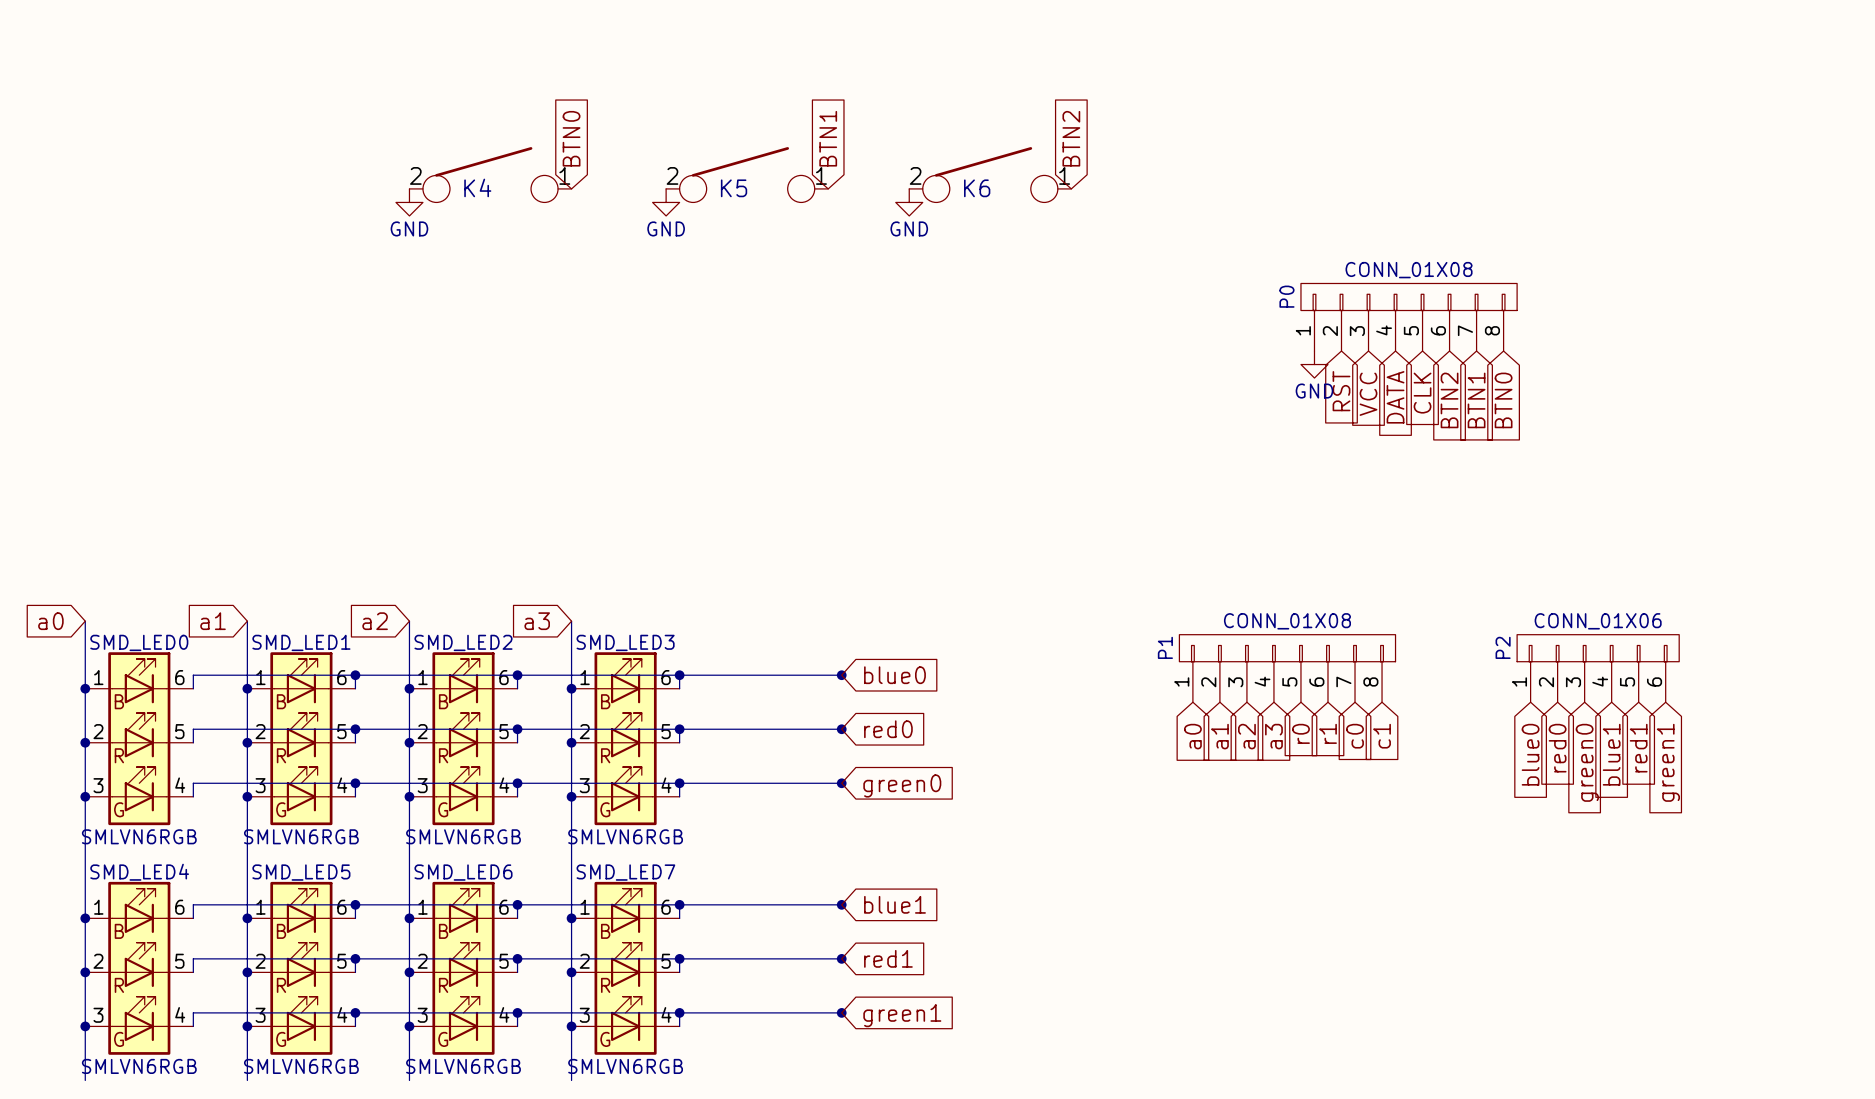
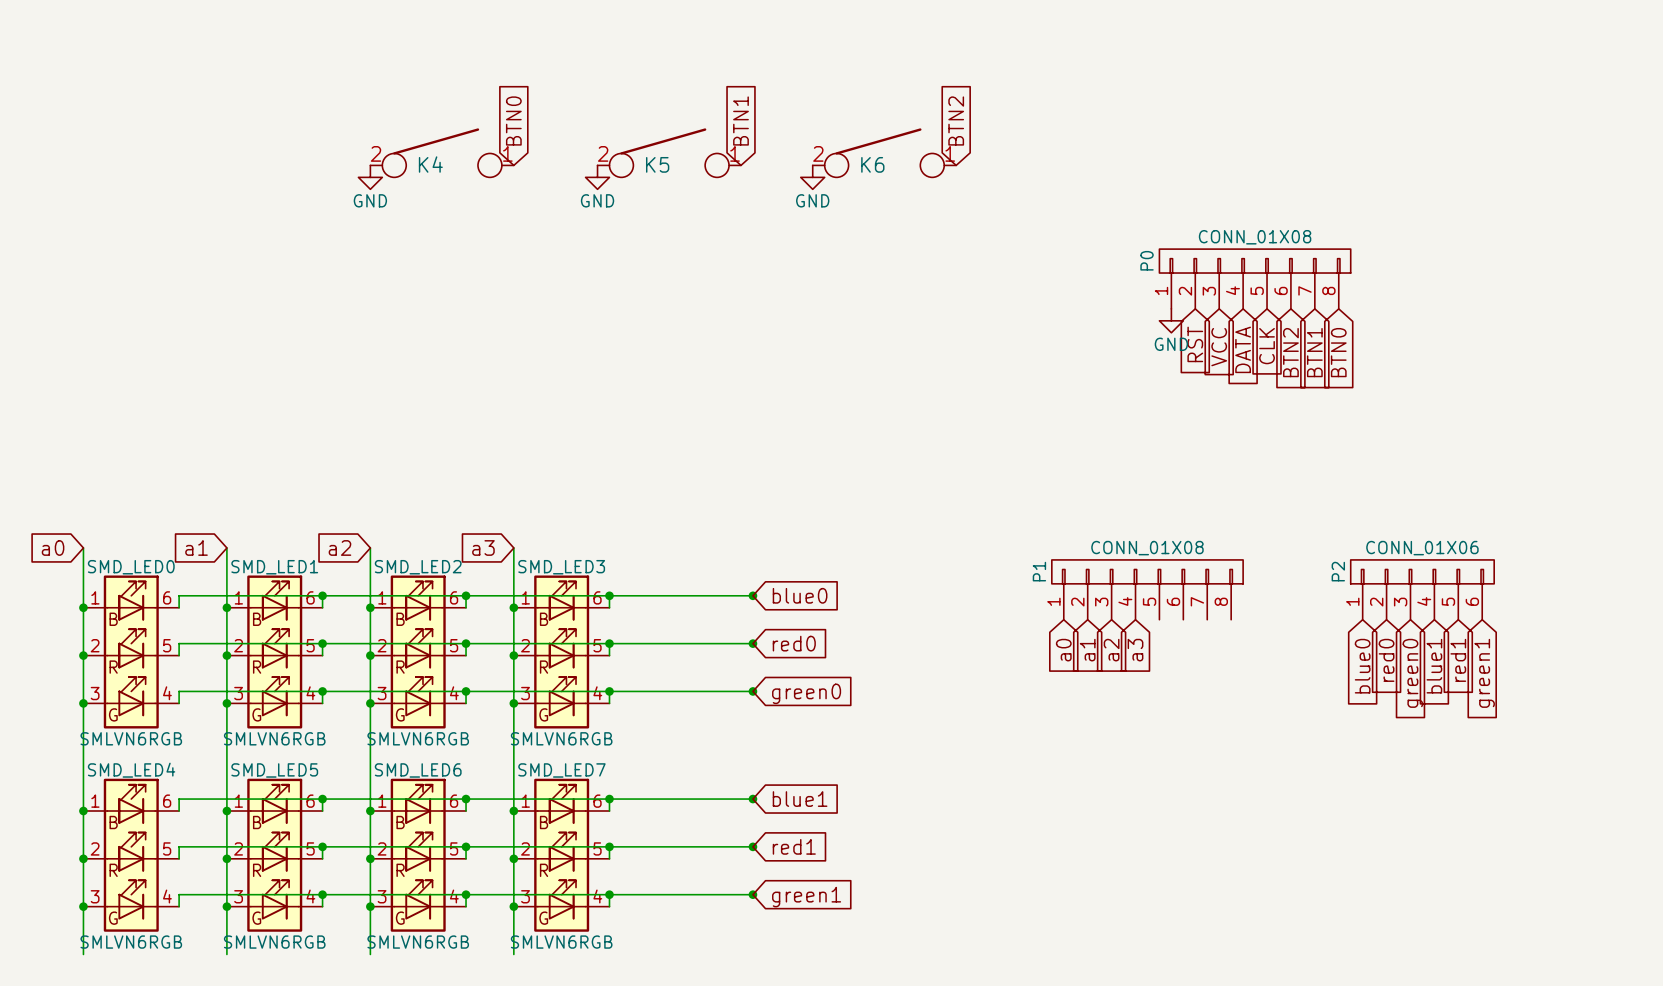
global label: r0 (1300, 733) -> none
global label: r1 (1327, 733) -> none
global label: c0 (1355, 736) -> none
global label: c1 (1382, 736) -> none

